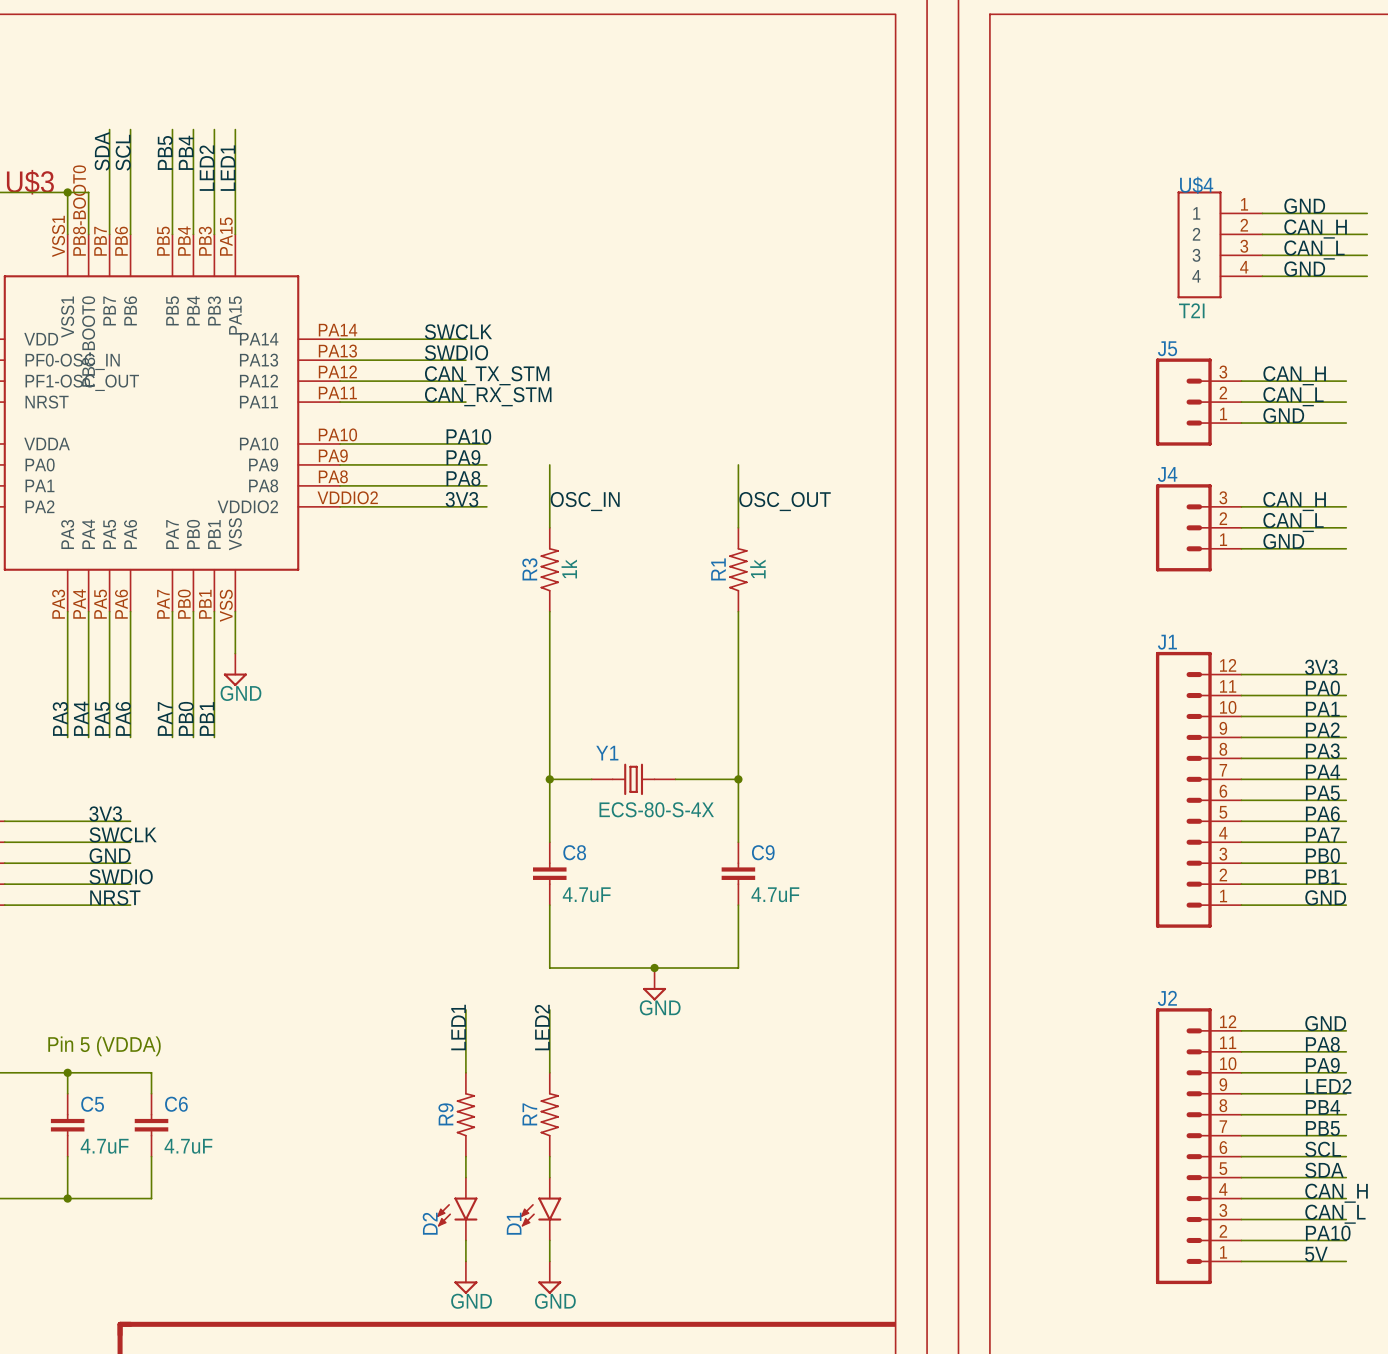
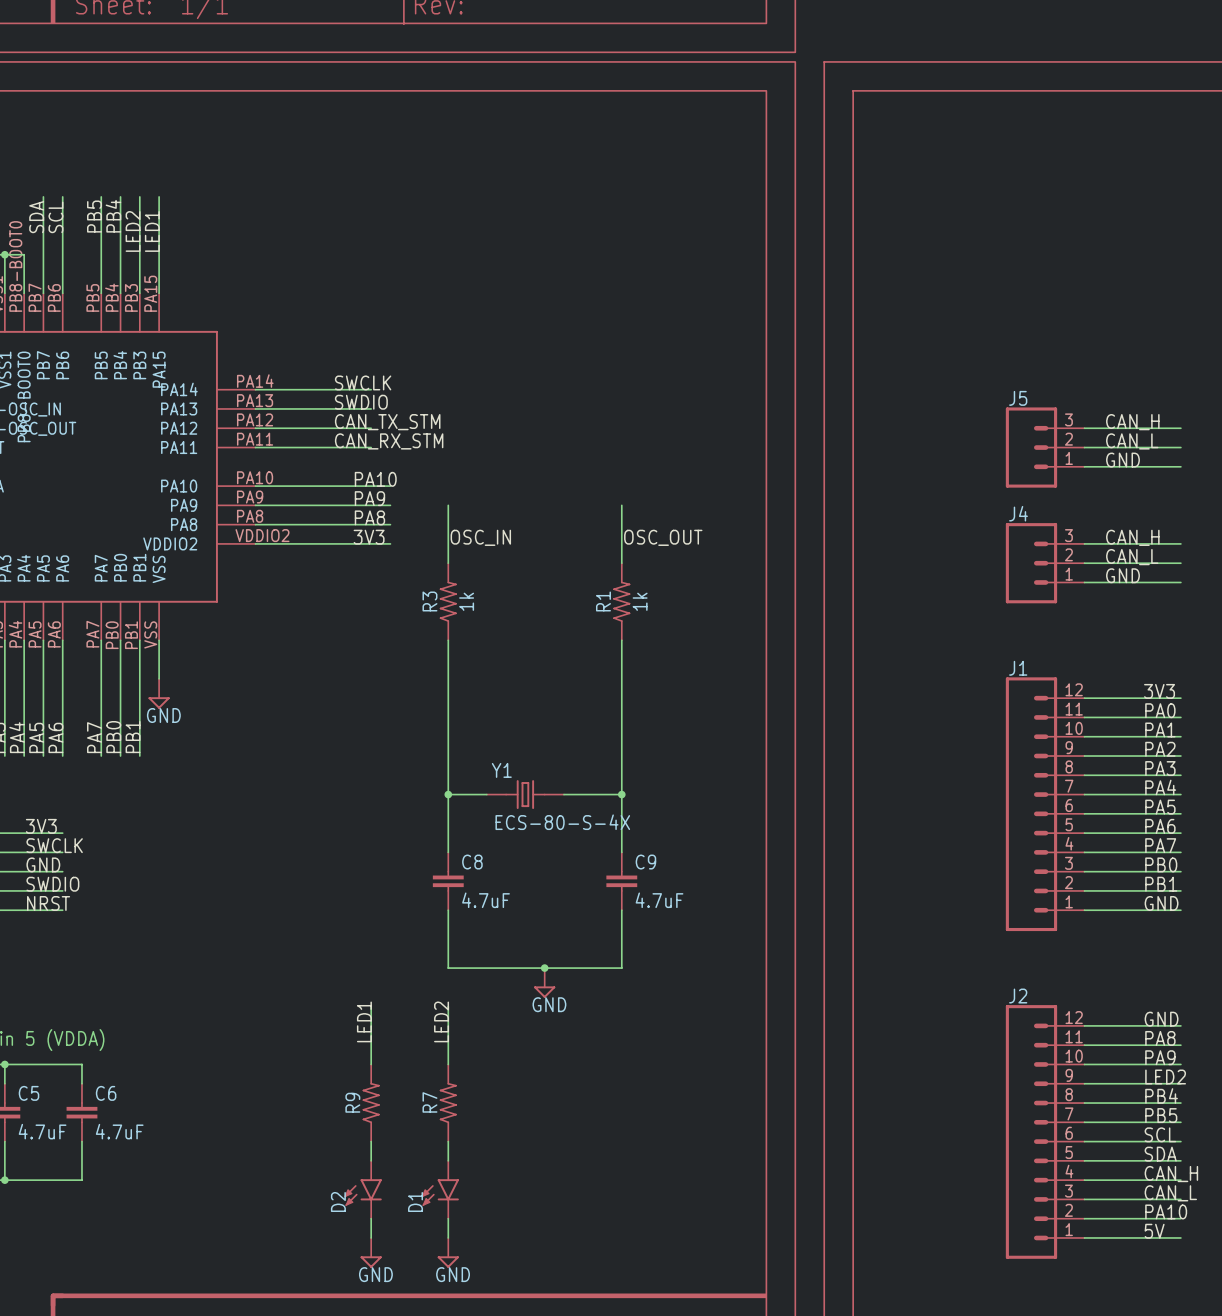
label: GND (1304, 206) -> none
wire: (1262, 213) (1367, 213) -> none
label: CAN_H (1315, 229) -> none
wire: (1262, 234) (1367, 234) -> none
U$4: T2I (1219, 244) -> none
label: CAN_L (1314, 250) -> none
wire: (1262, 255) (1367, 255) -> none
label: GND (1304, 268) -> none
wire: (1262, 276) (1367, 276) -> none

